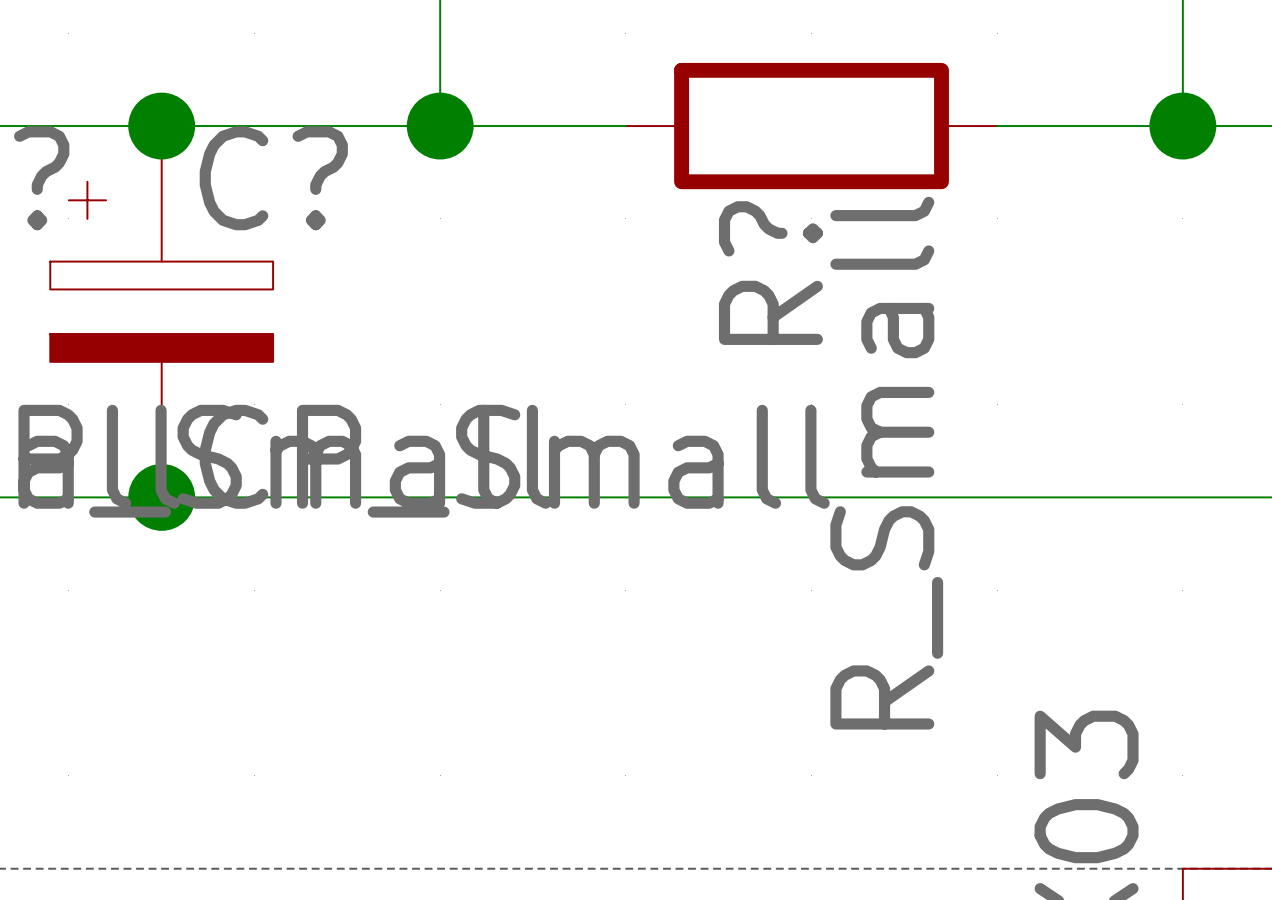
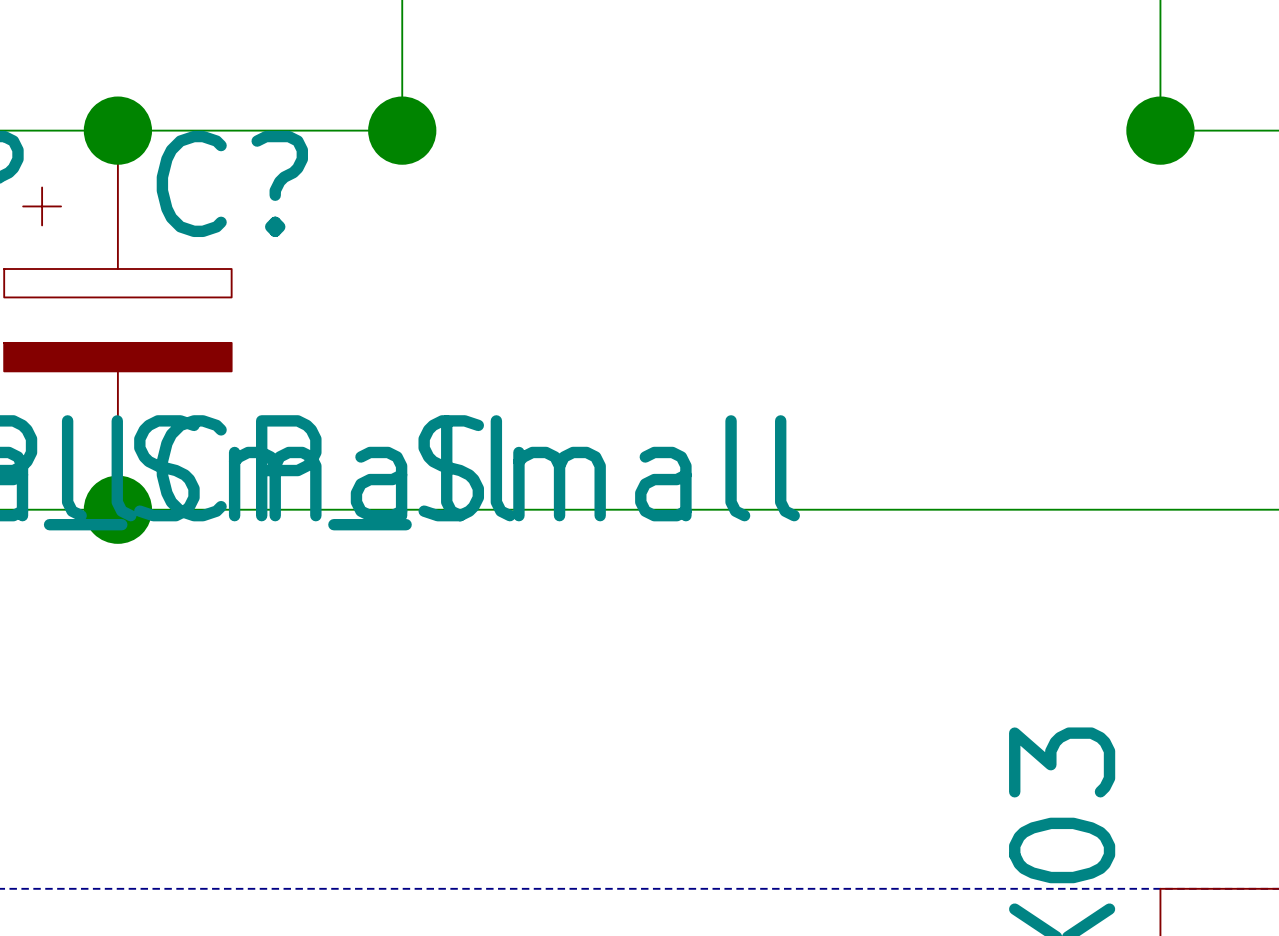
wire: (440, 126) (625, 126) -> none
R?: R_Small (811, 126) -> none
wire: (997, 126) (1182, 126) -> none

